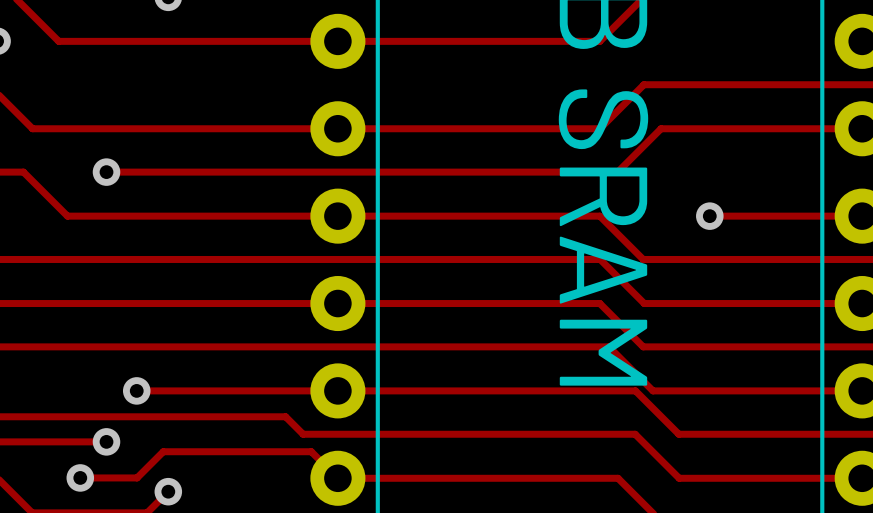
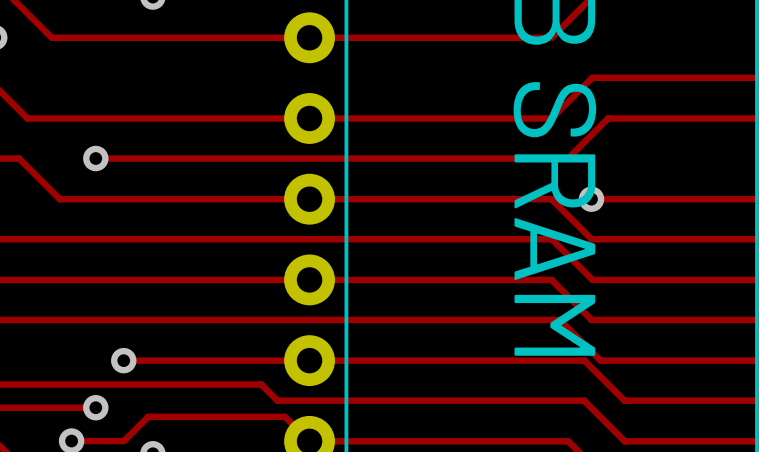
track: none -> (591, 199) (653, 199)
via position: (709, 216) -> (591, 199)

